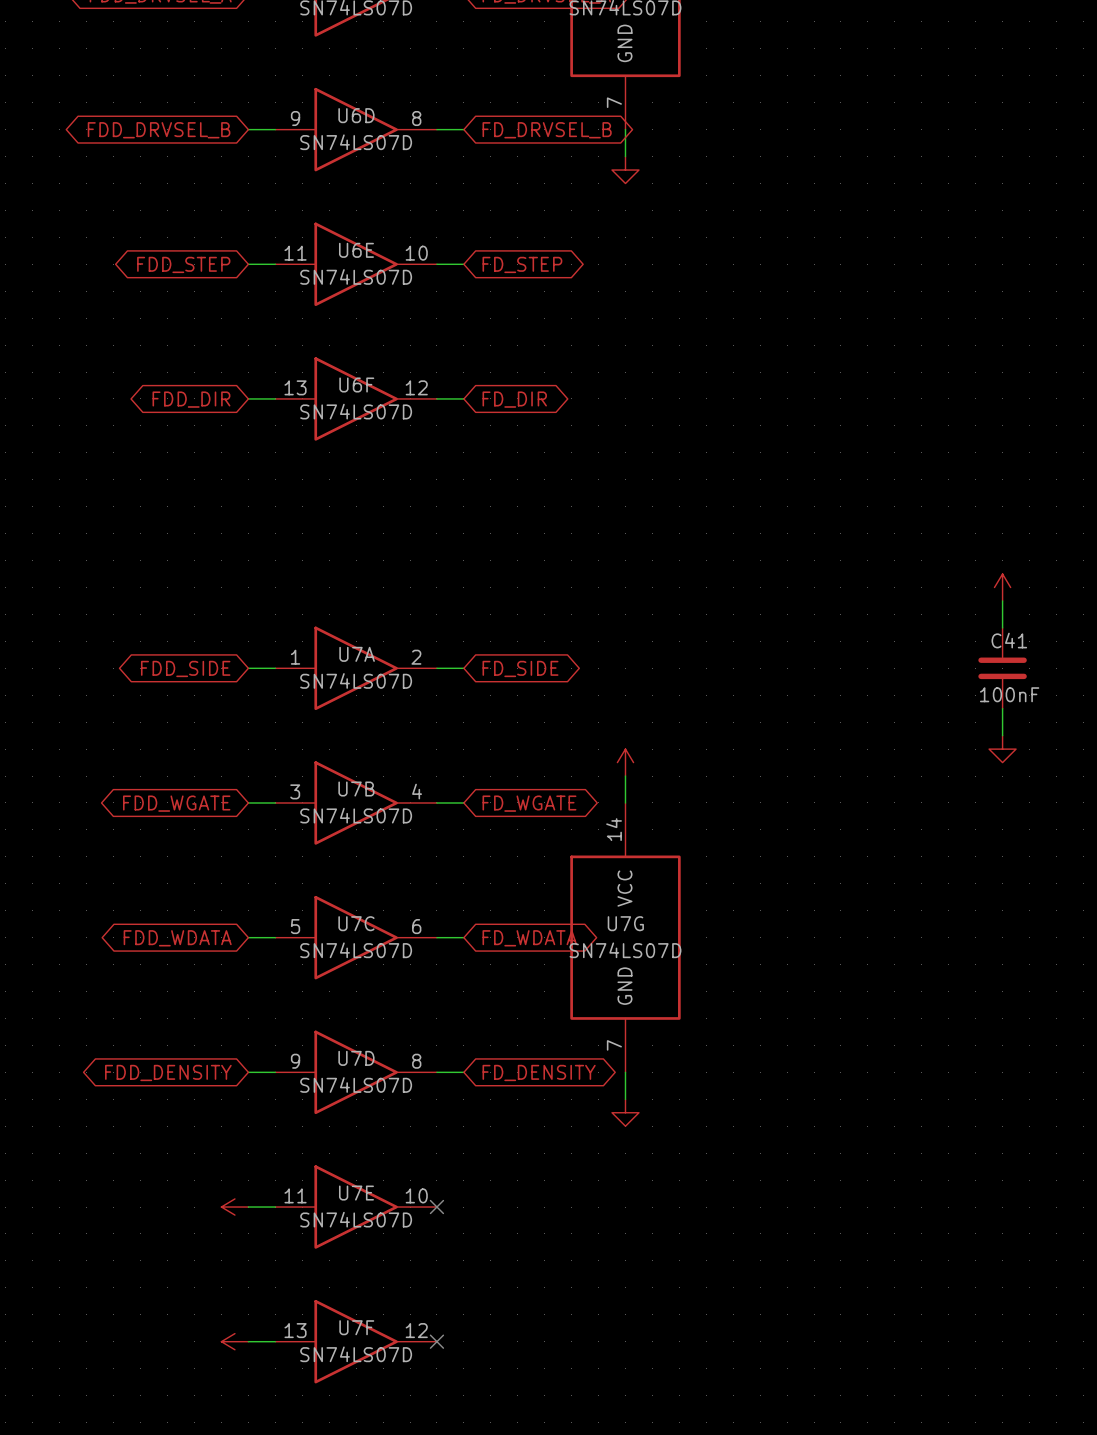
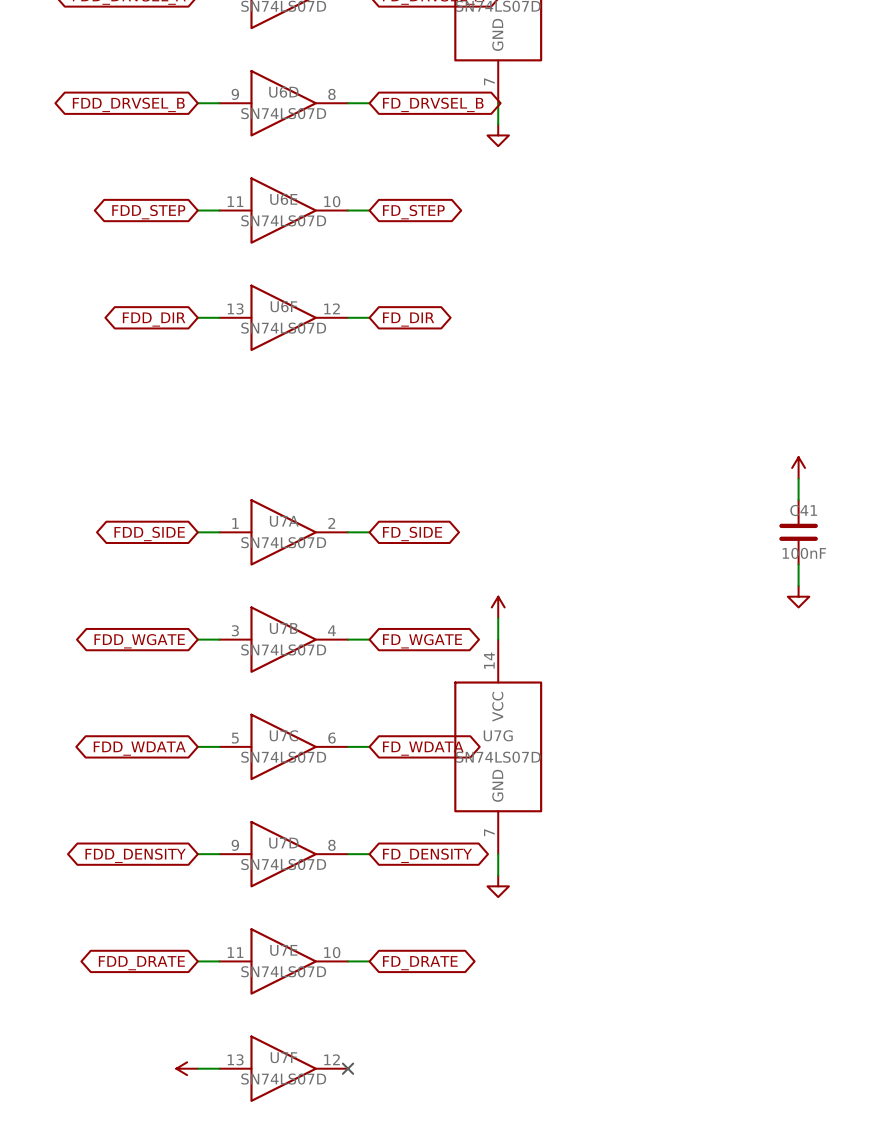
global label: none -> FDD_DRATE (141, 963)
power symbol: (234, 1207) -> none
wire: none -> (348, 961) (369, 961)
no-connect mark: (436, 1207) -> none
global label: none -> FD_DRATE (420, 963)

